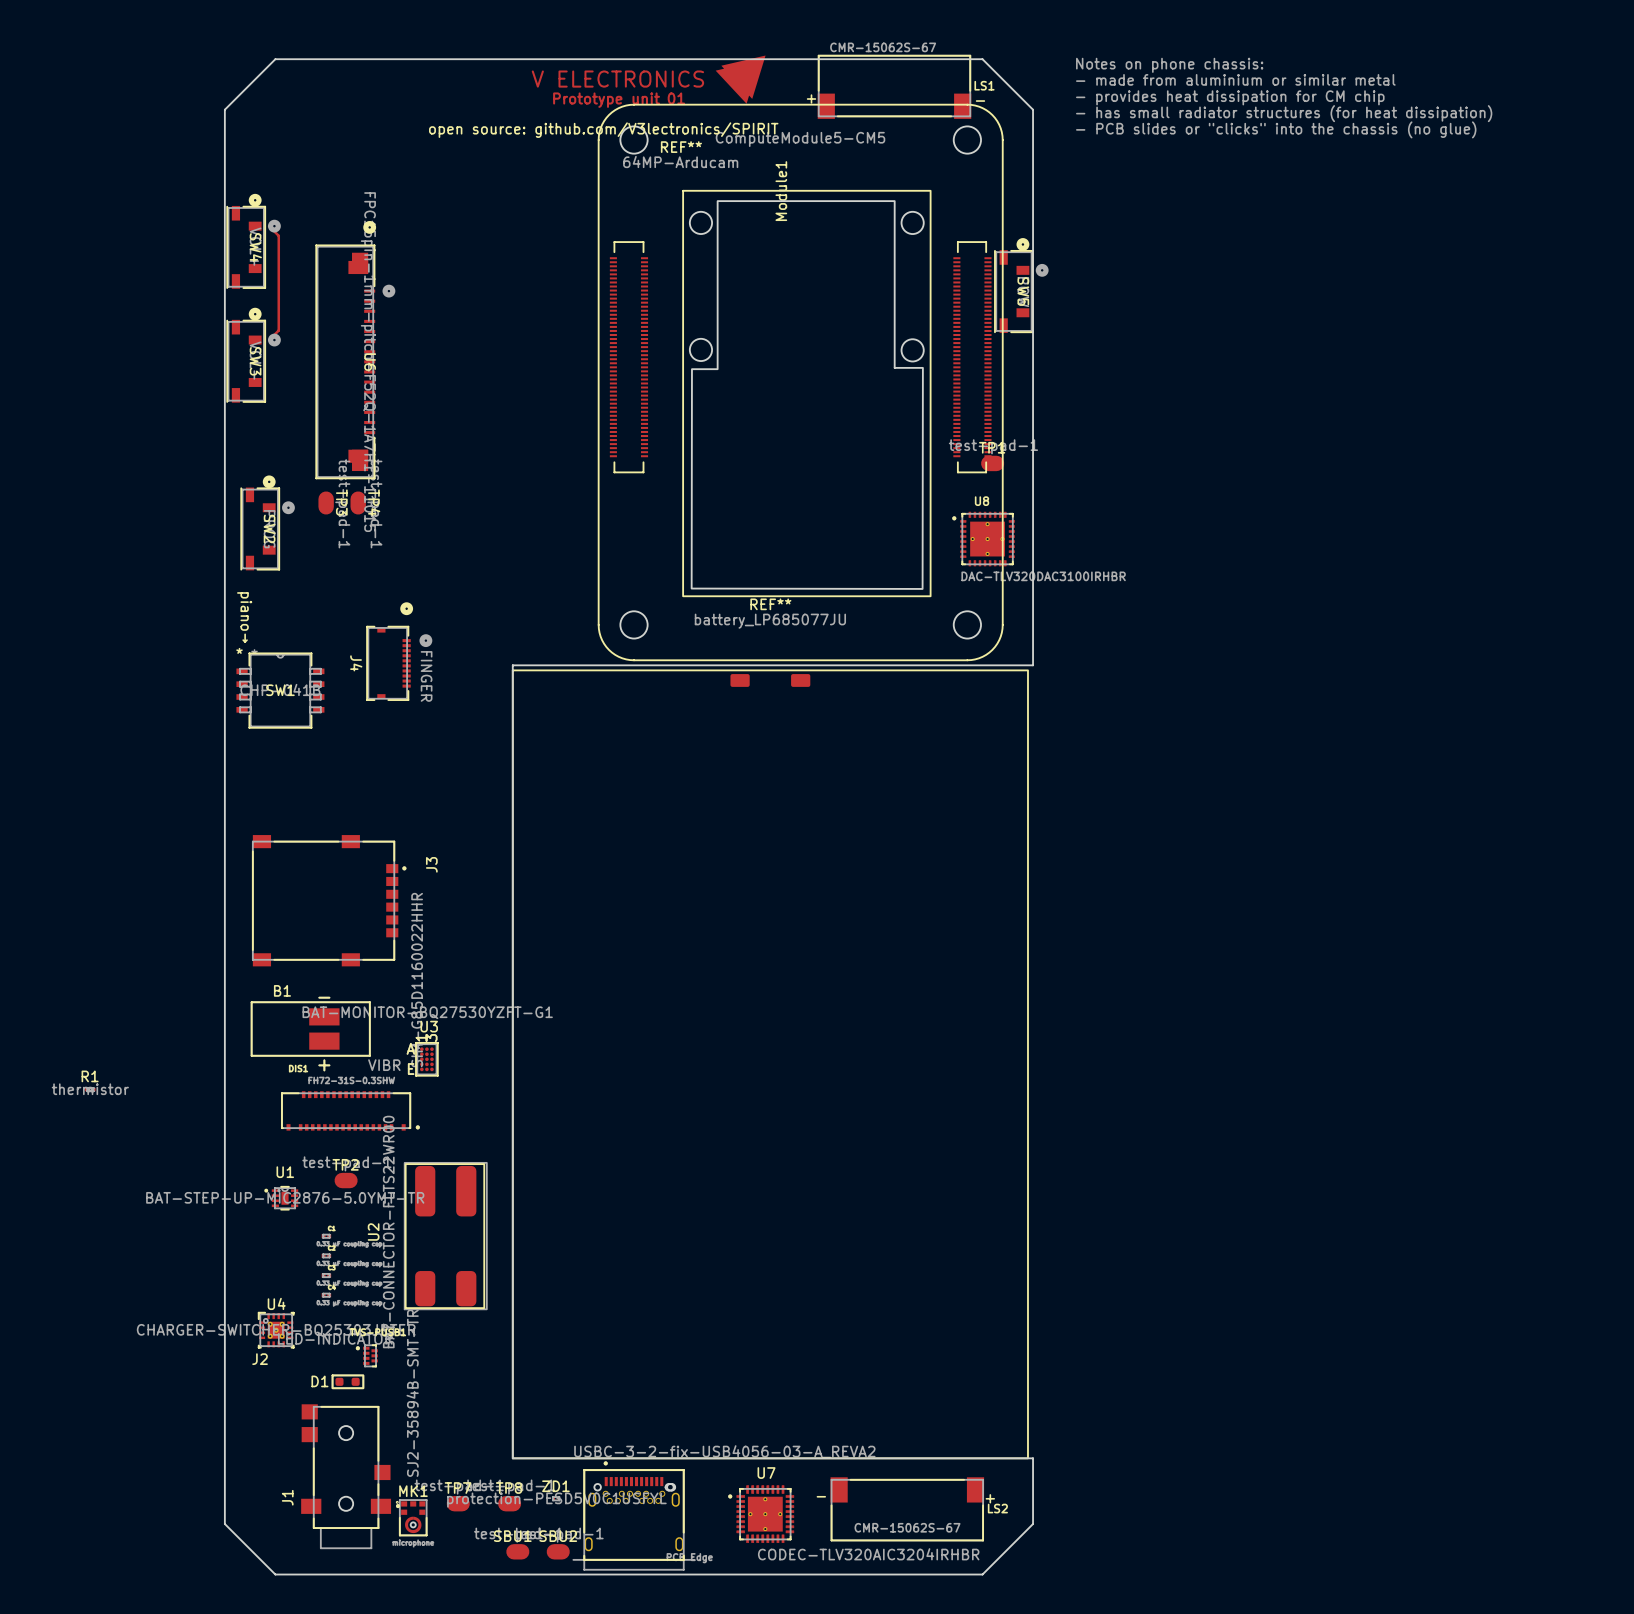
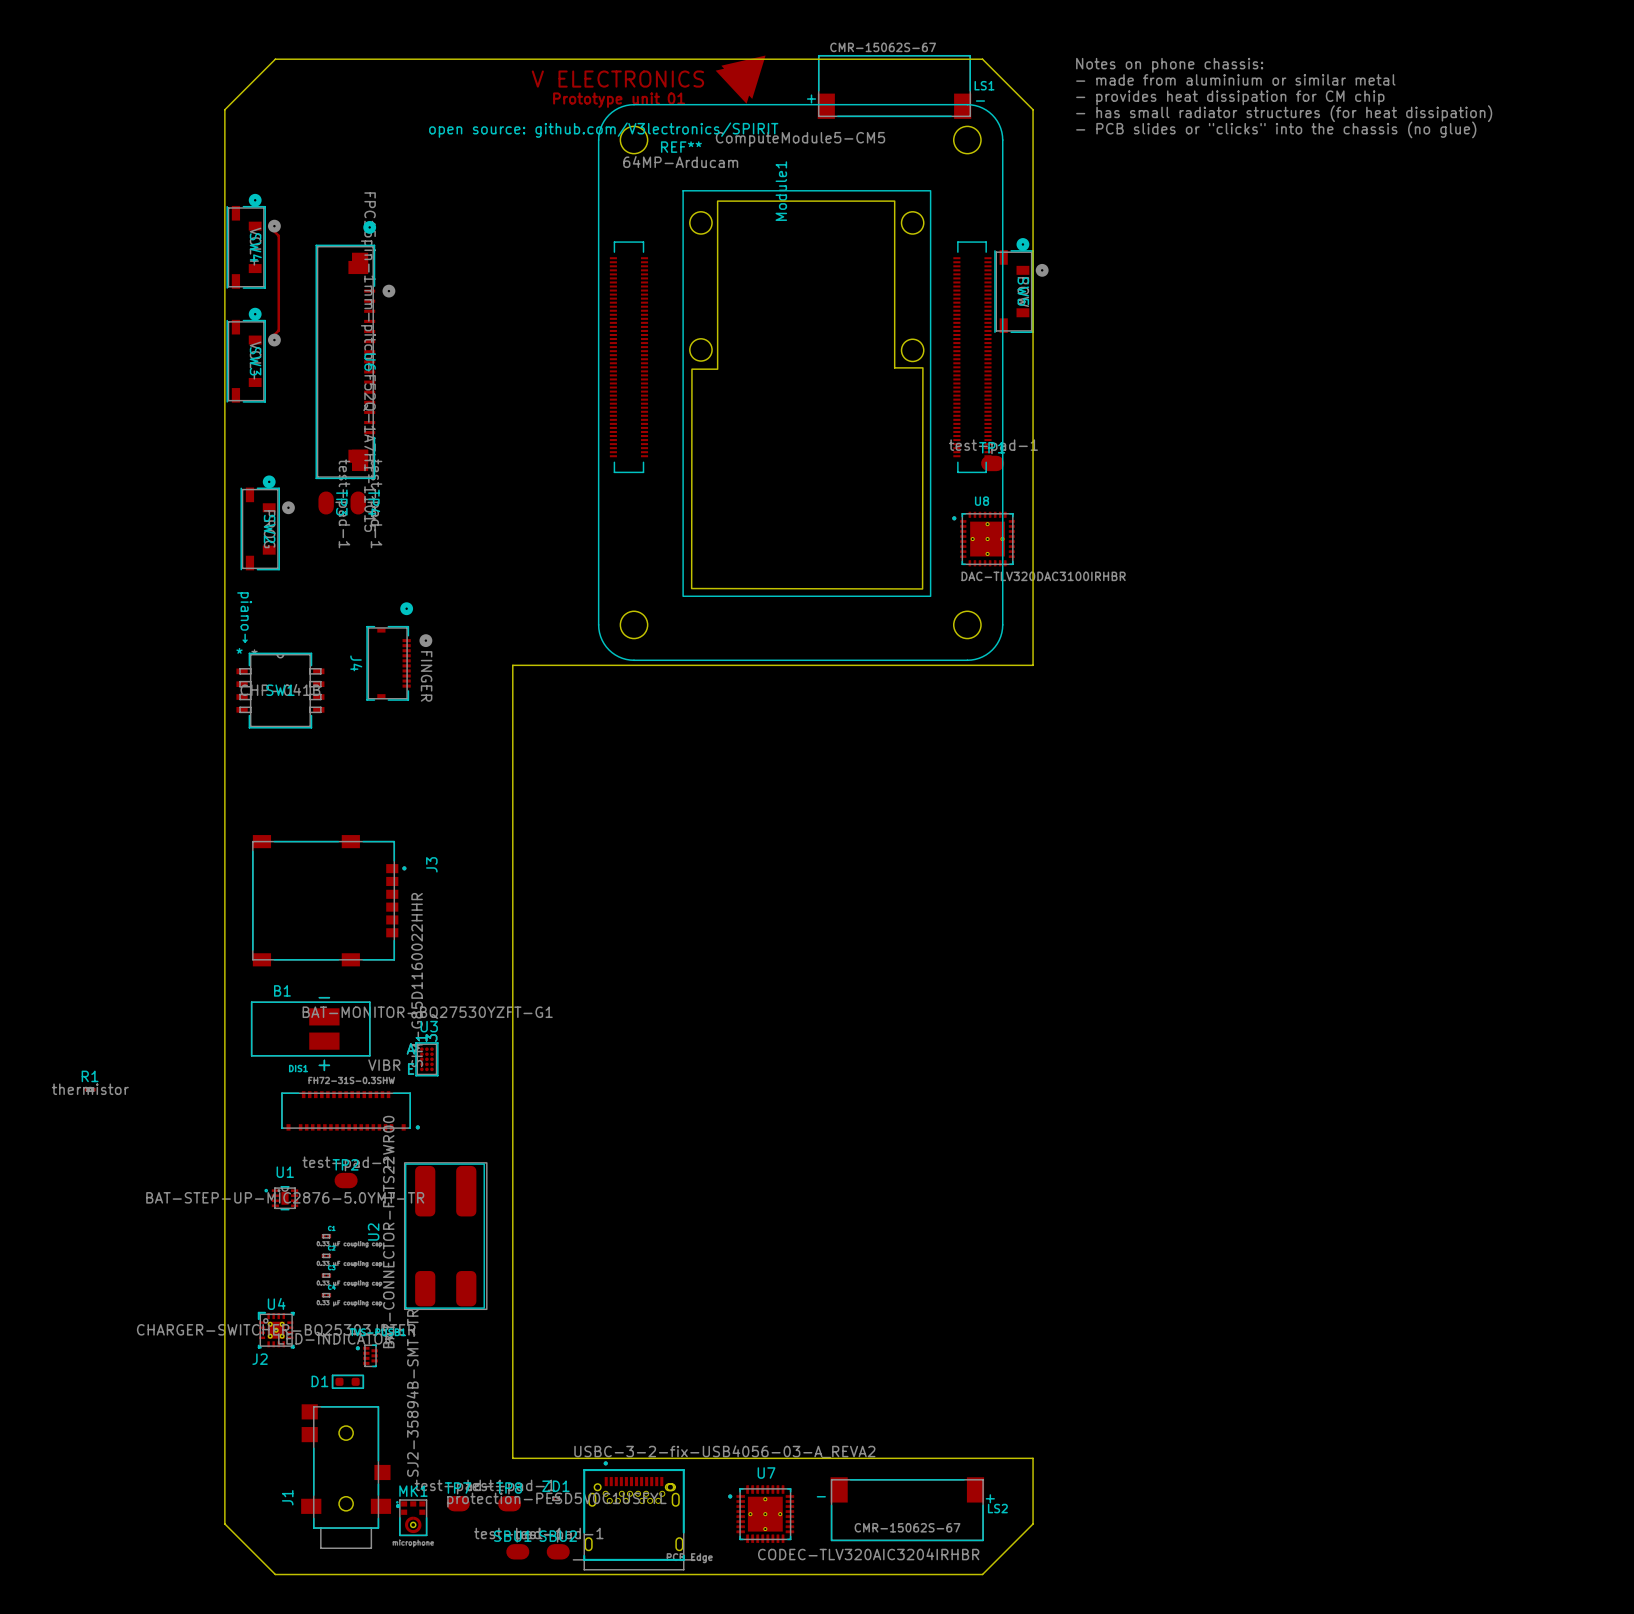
REF**: battery_LP685077JU (770, 1064) -> none

